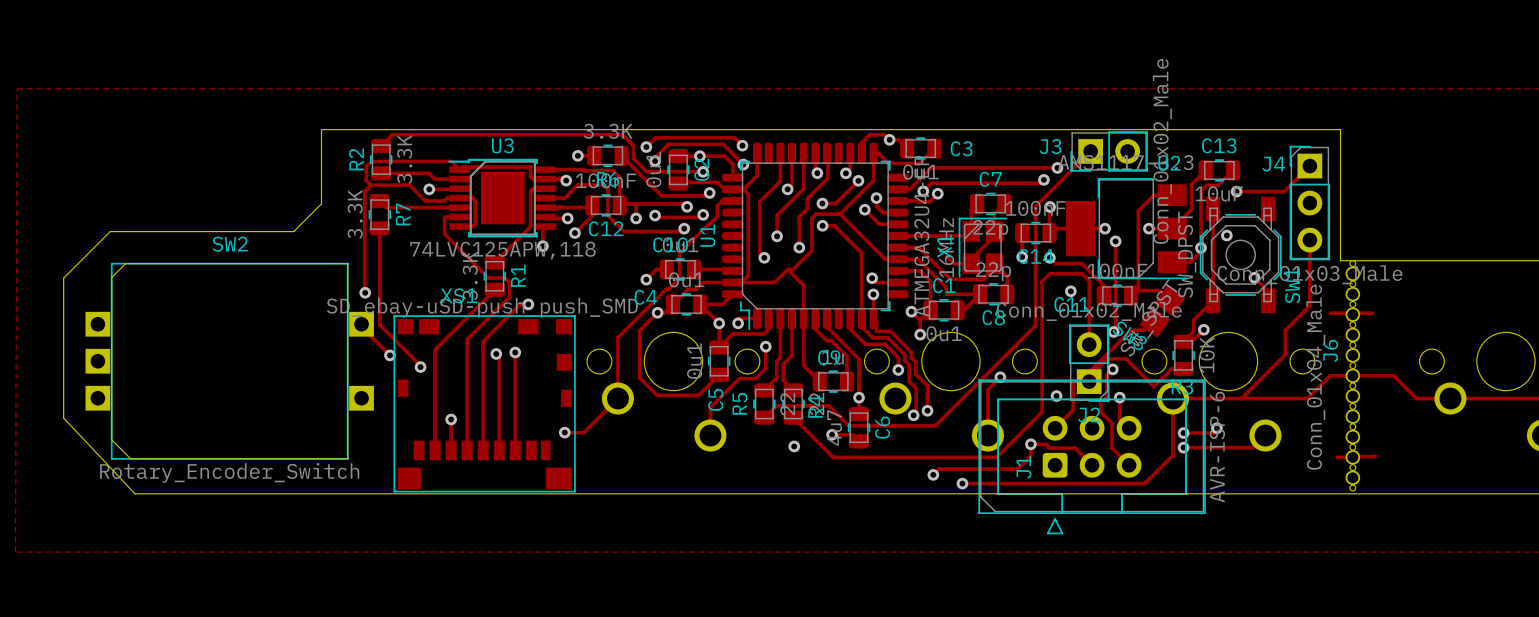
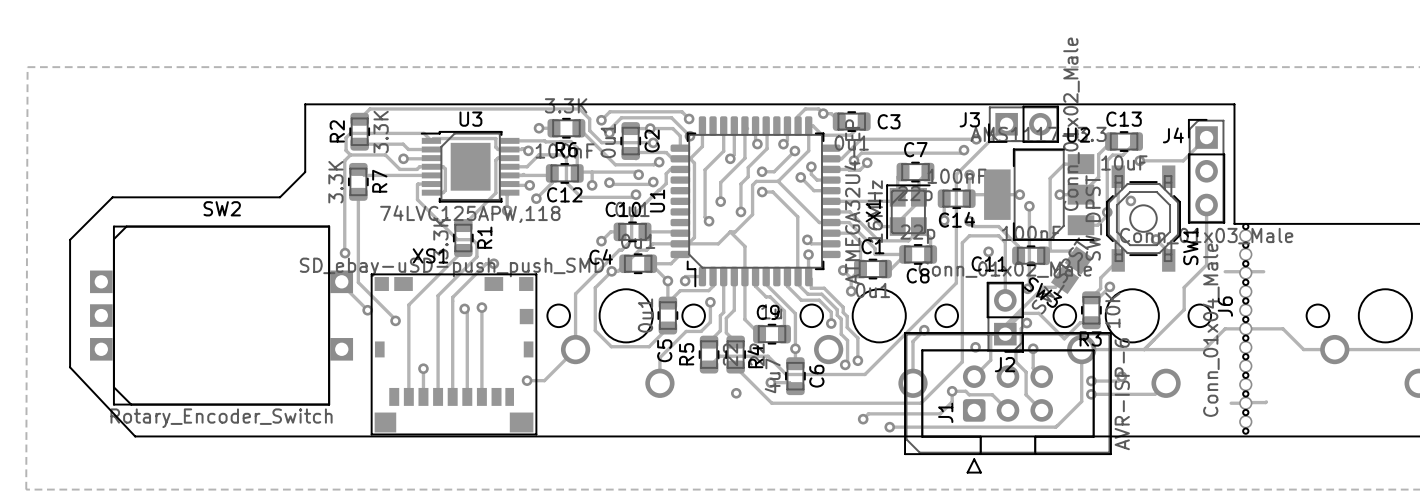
XS1 footprint: [393, 315, 576, 493] -> [370, 273, 538, 436]

